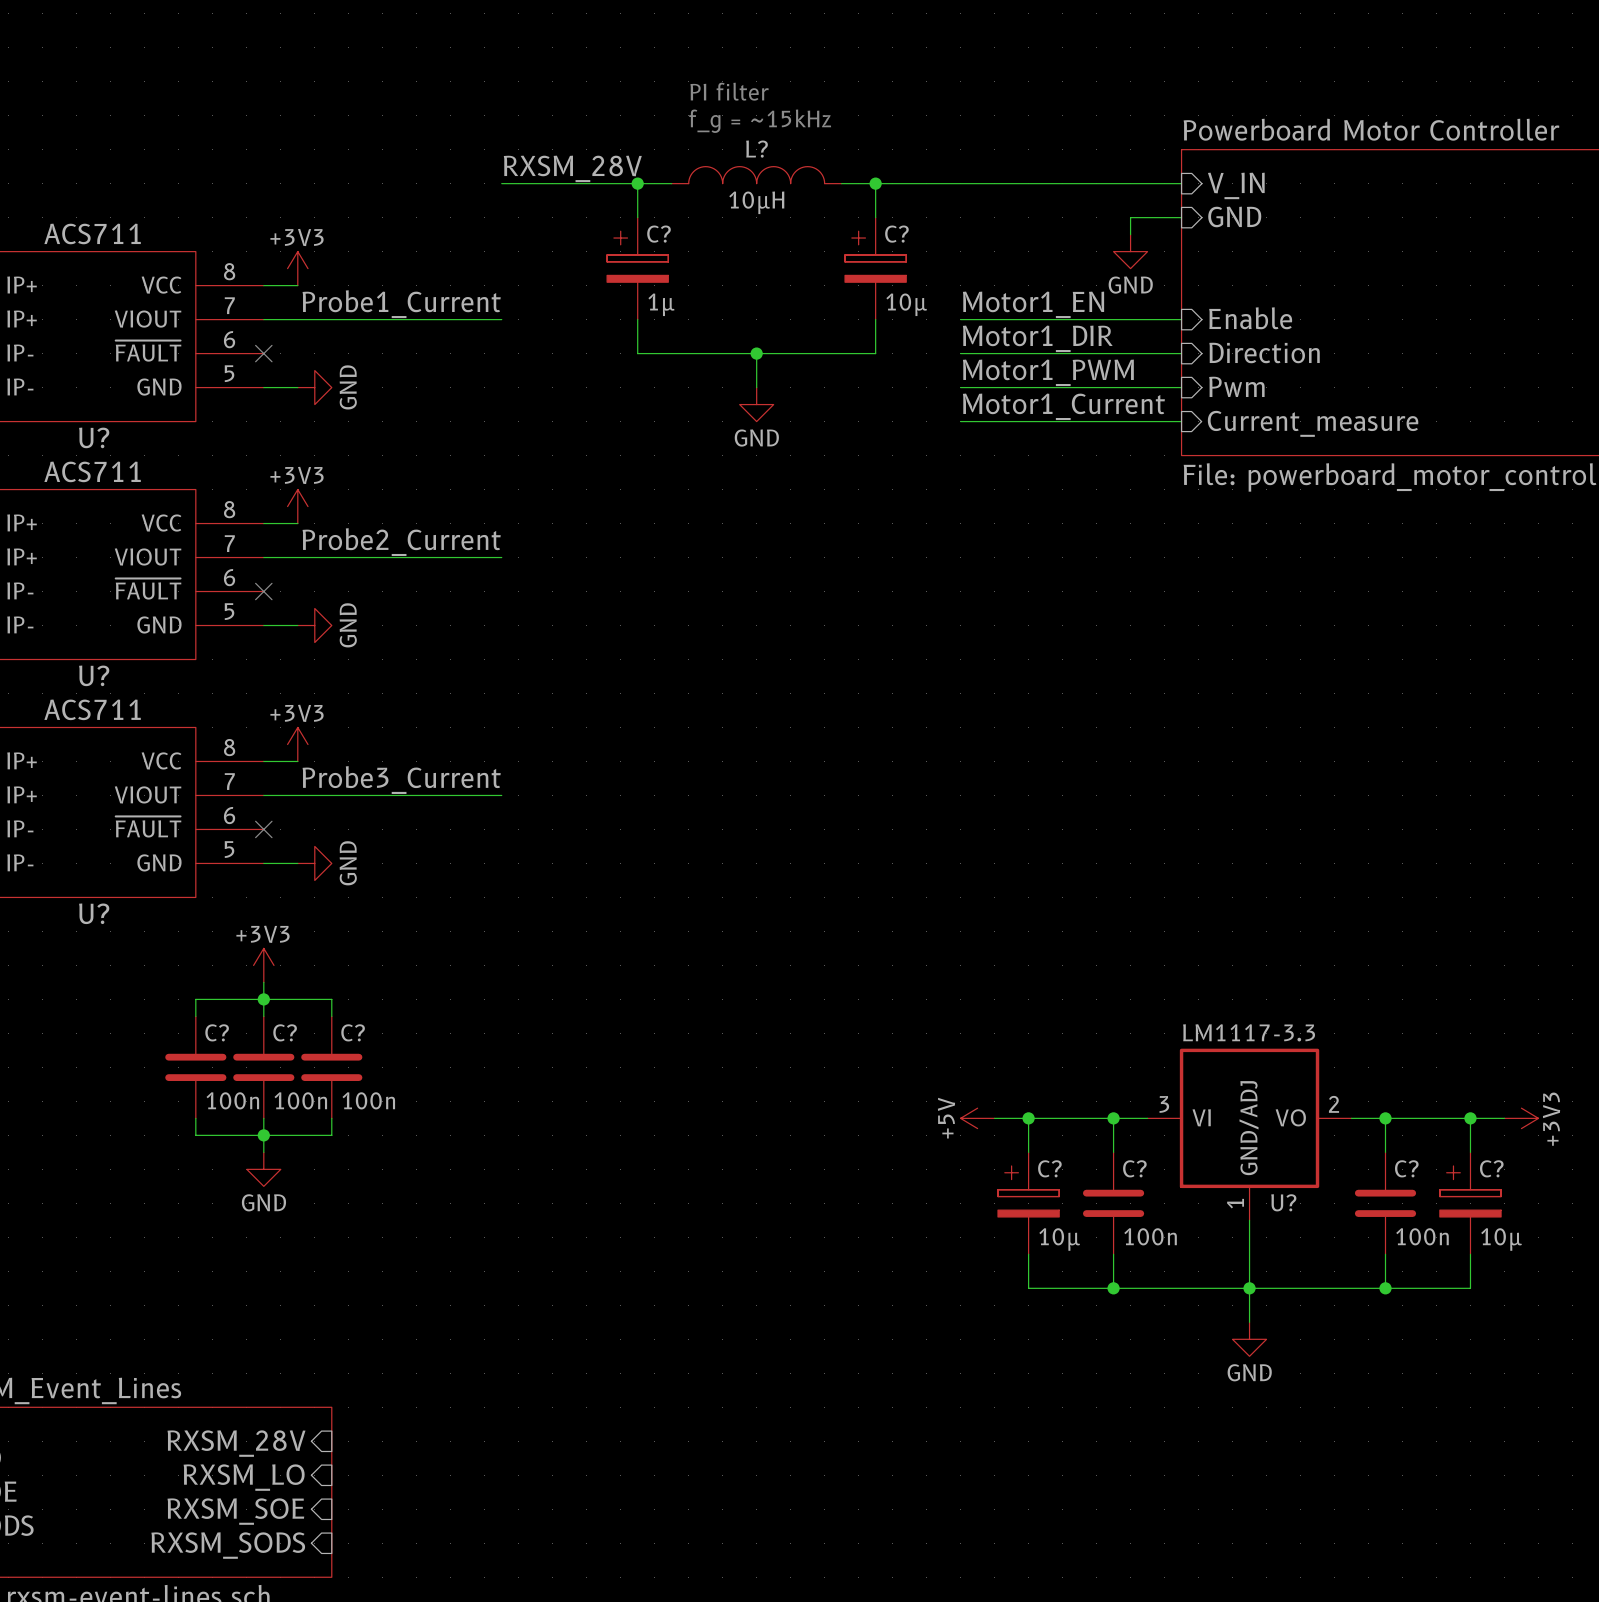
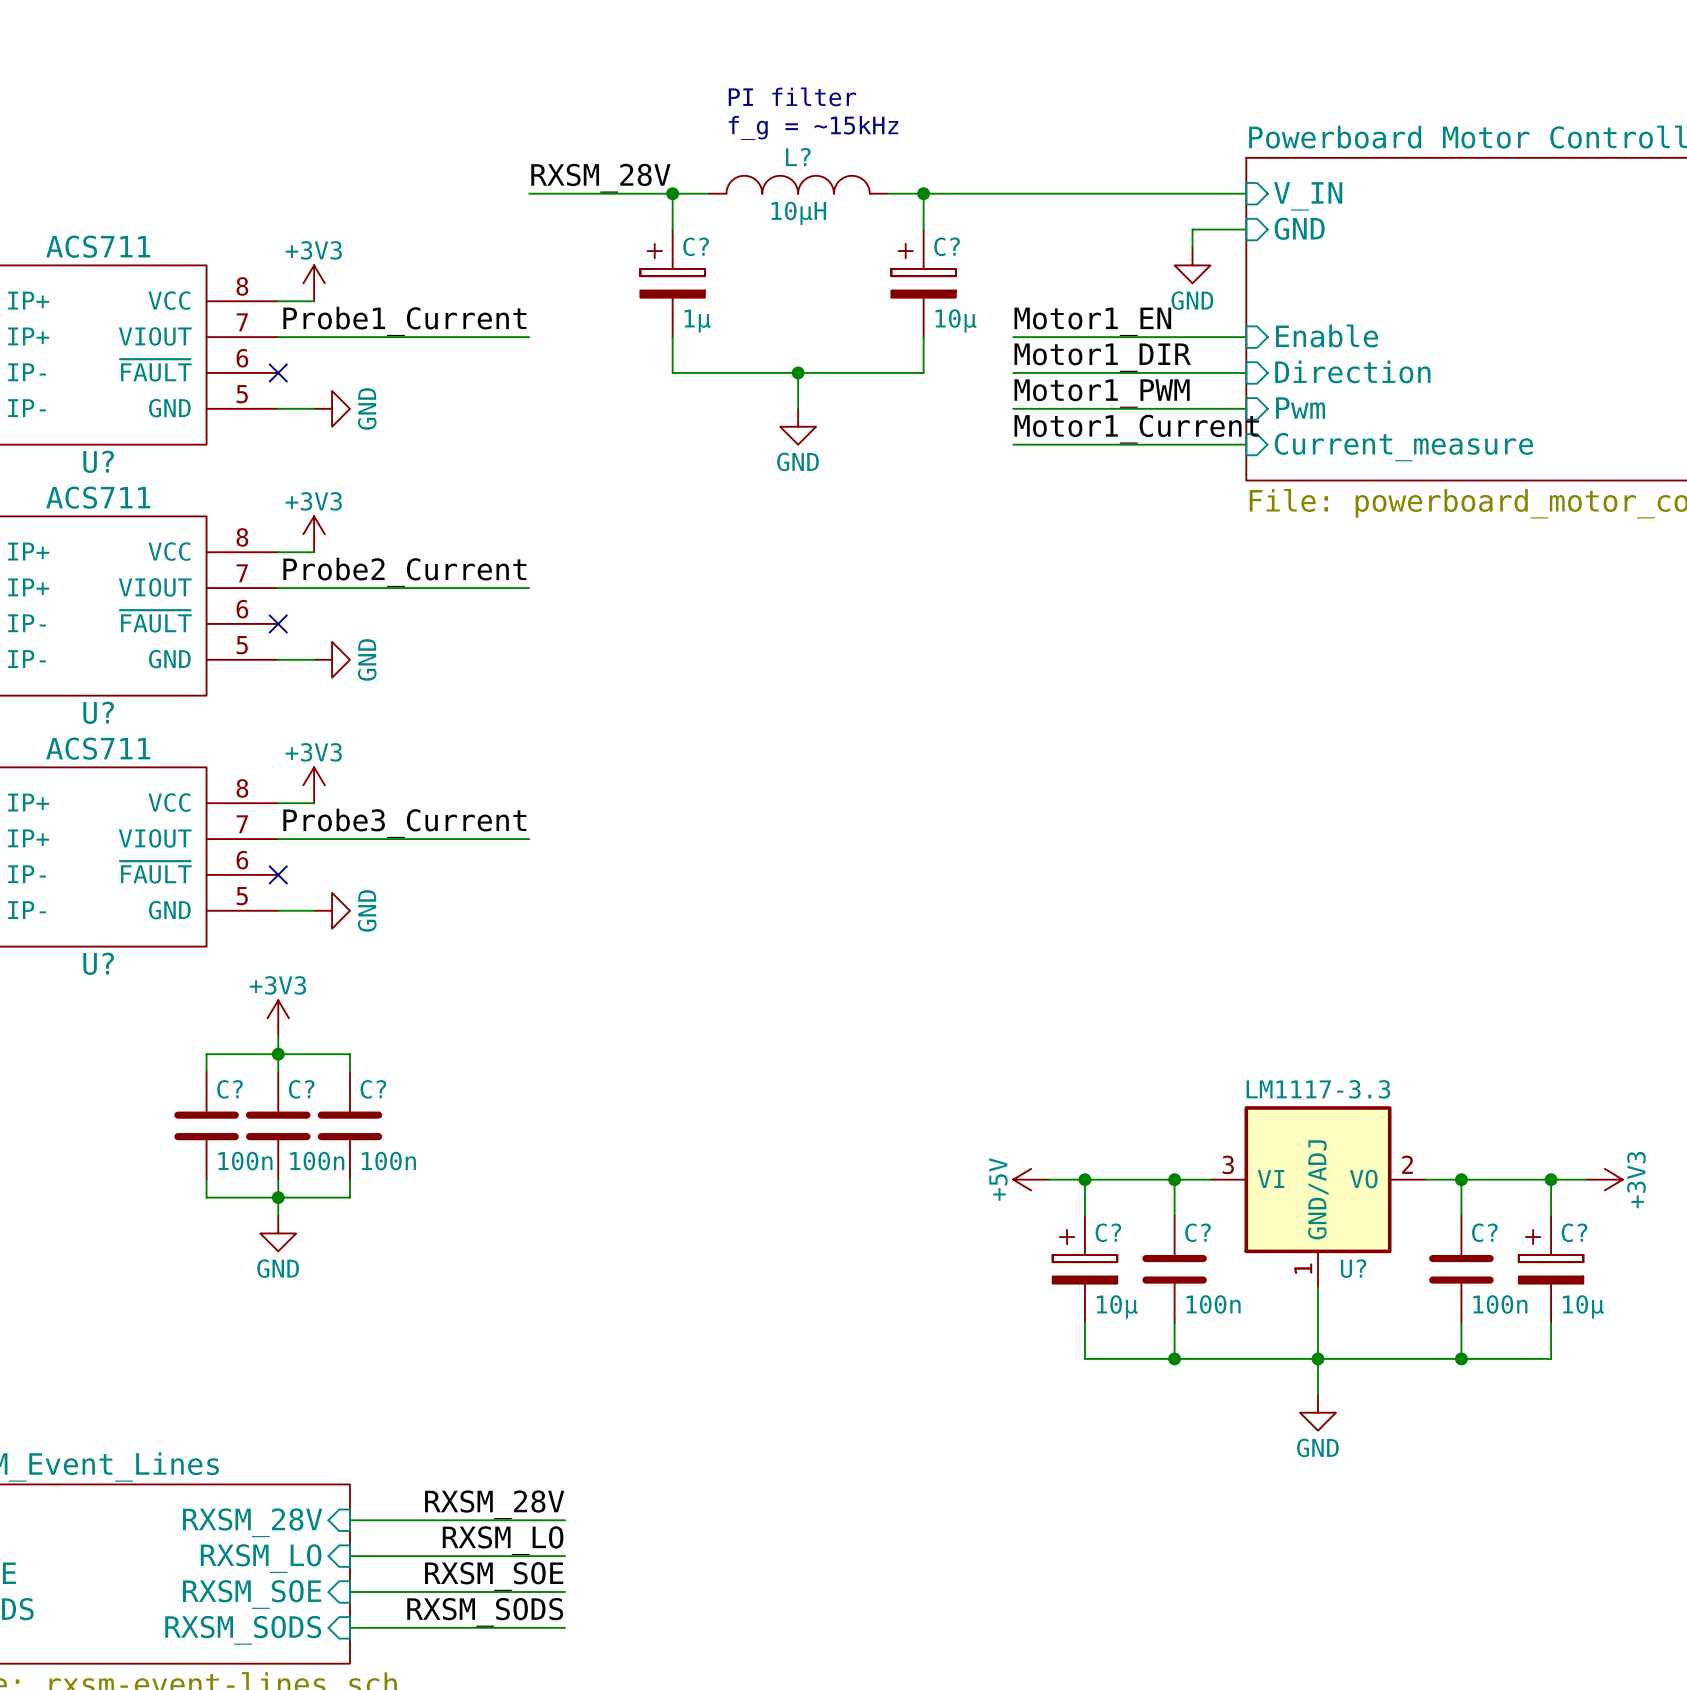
label: none -> RXSM_28V (494, 1504)
wire: none -> (349, 1520) (565, 1520)
label: none -> RXSM_LO (503, 1540)
wire: none -> (349, 1556) (565, 1556)
label: none -> RXSM_SOE (494, 1576)
wire: none -> (349, 1591) (565, 1591)
label: none -> RXSM_SODS (485, 1612)
wire: none -> (349, 1627) (565, 1627)

